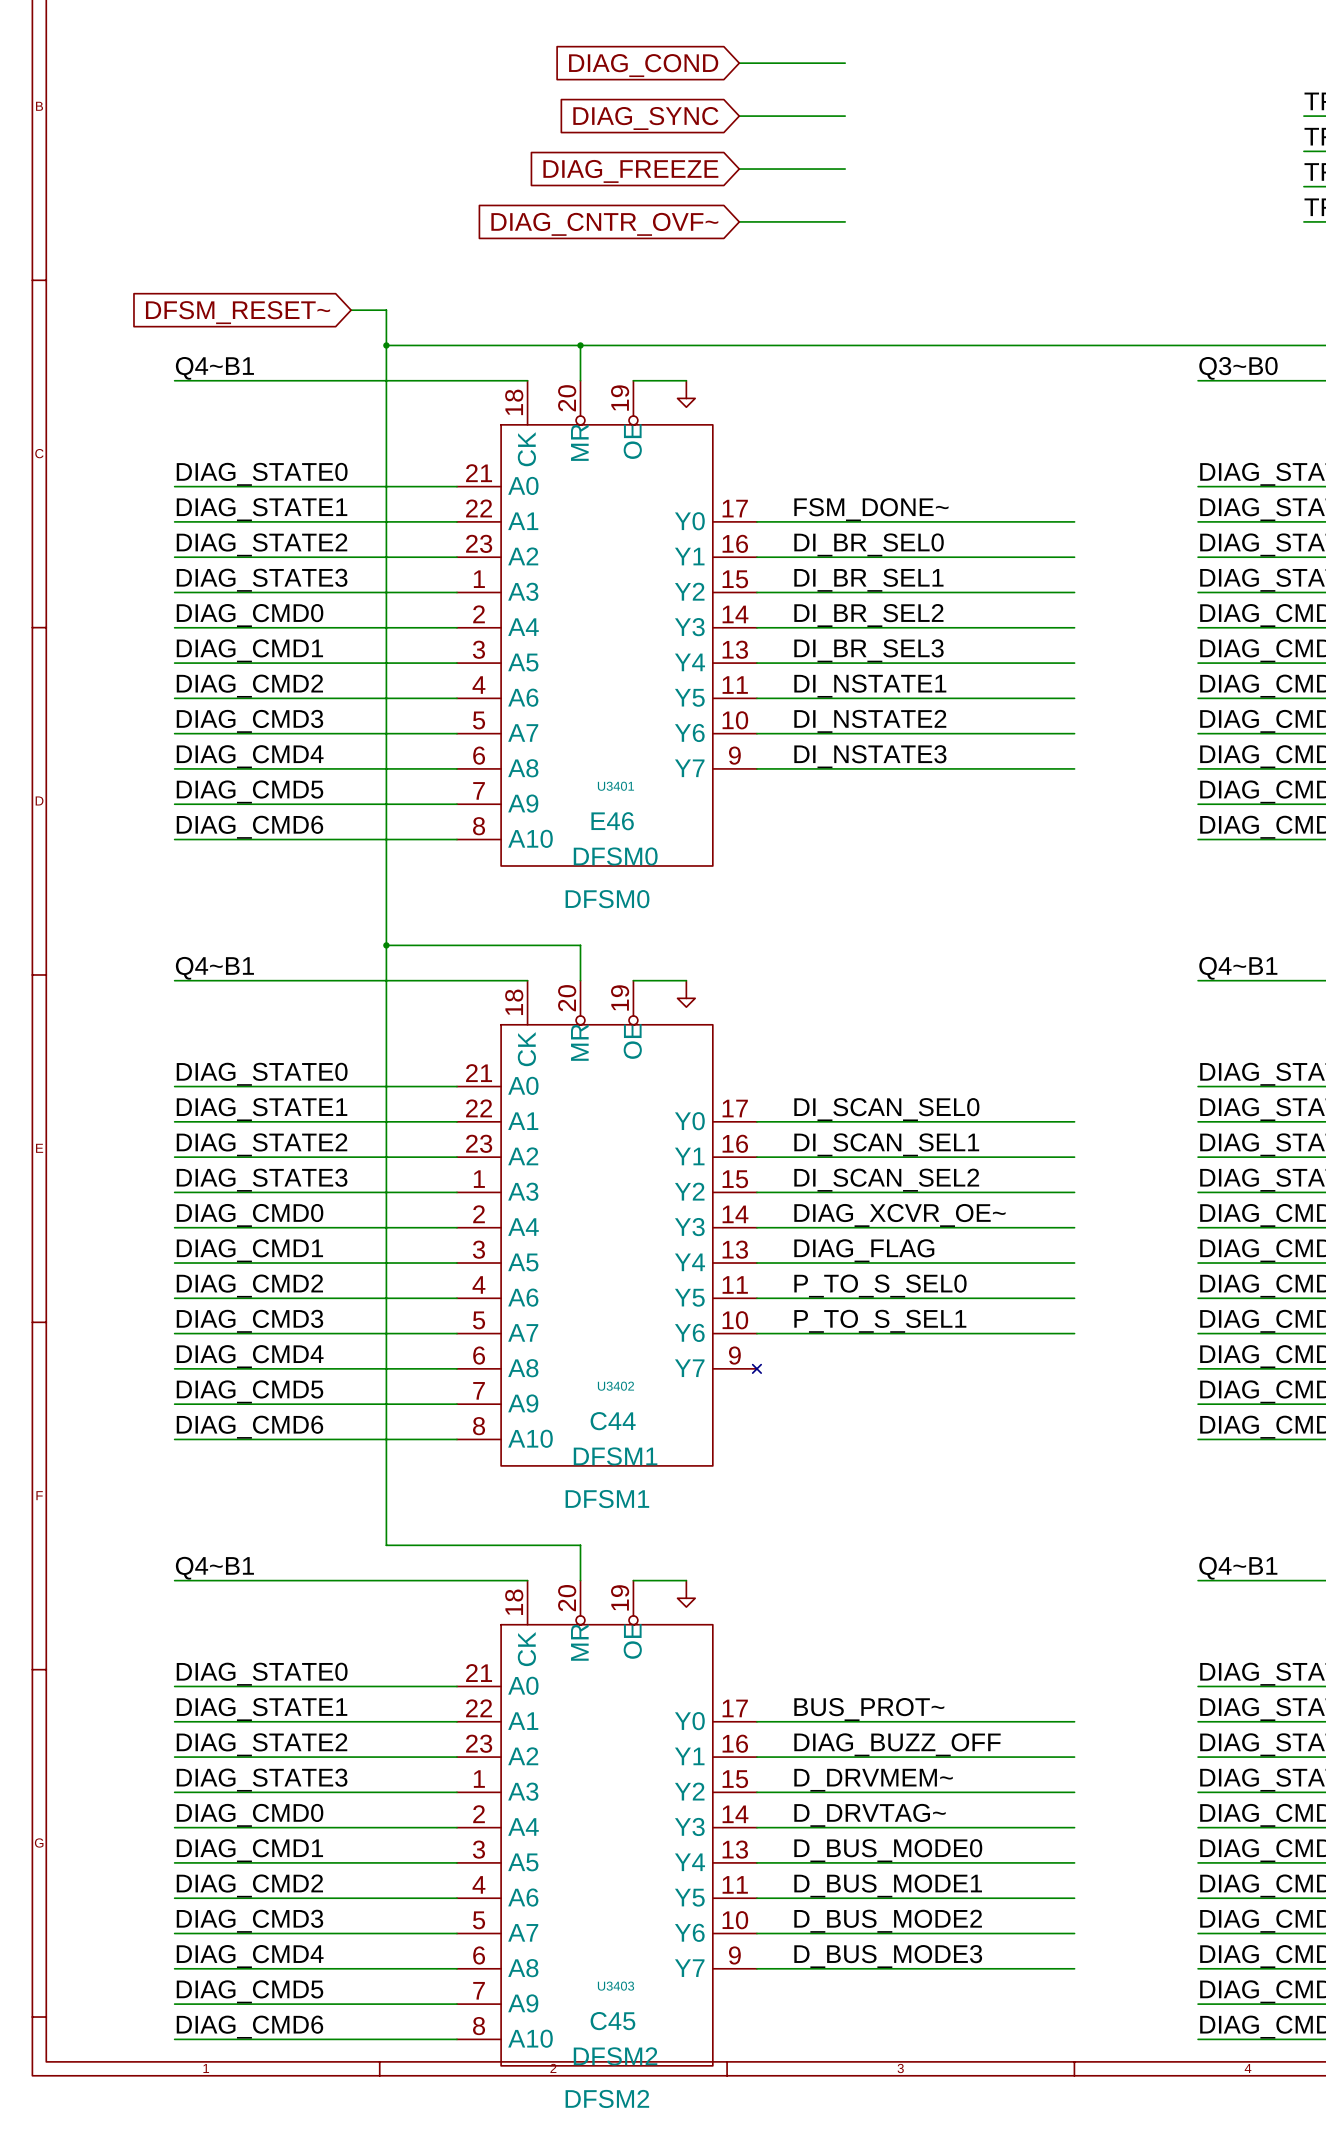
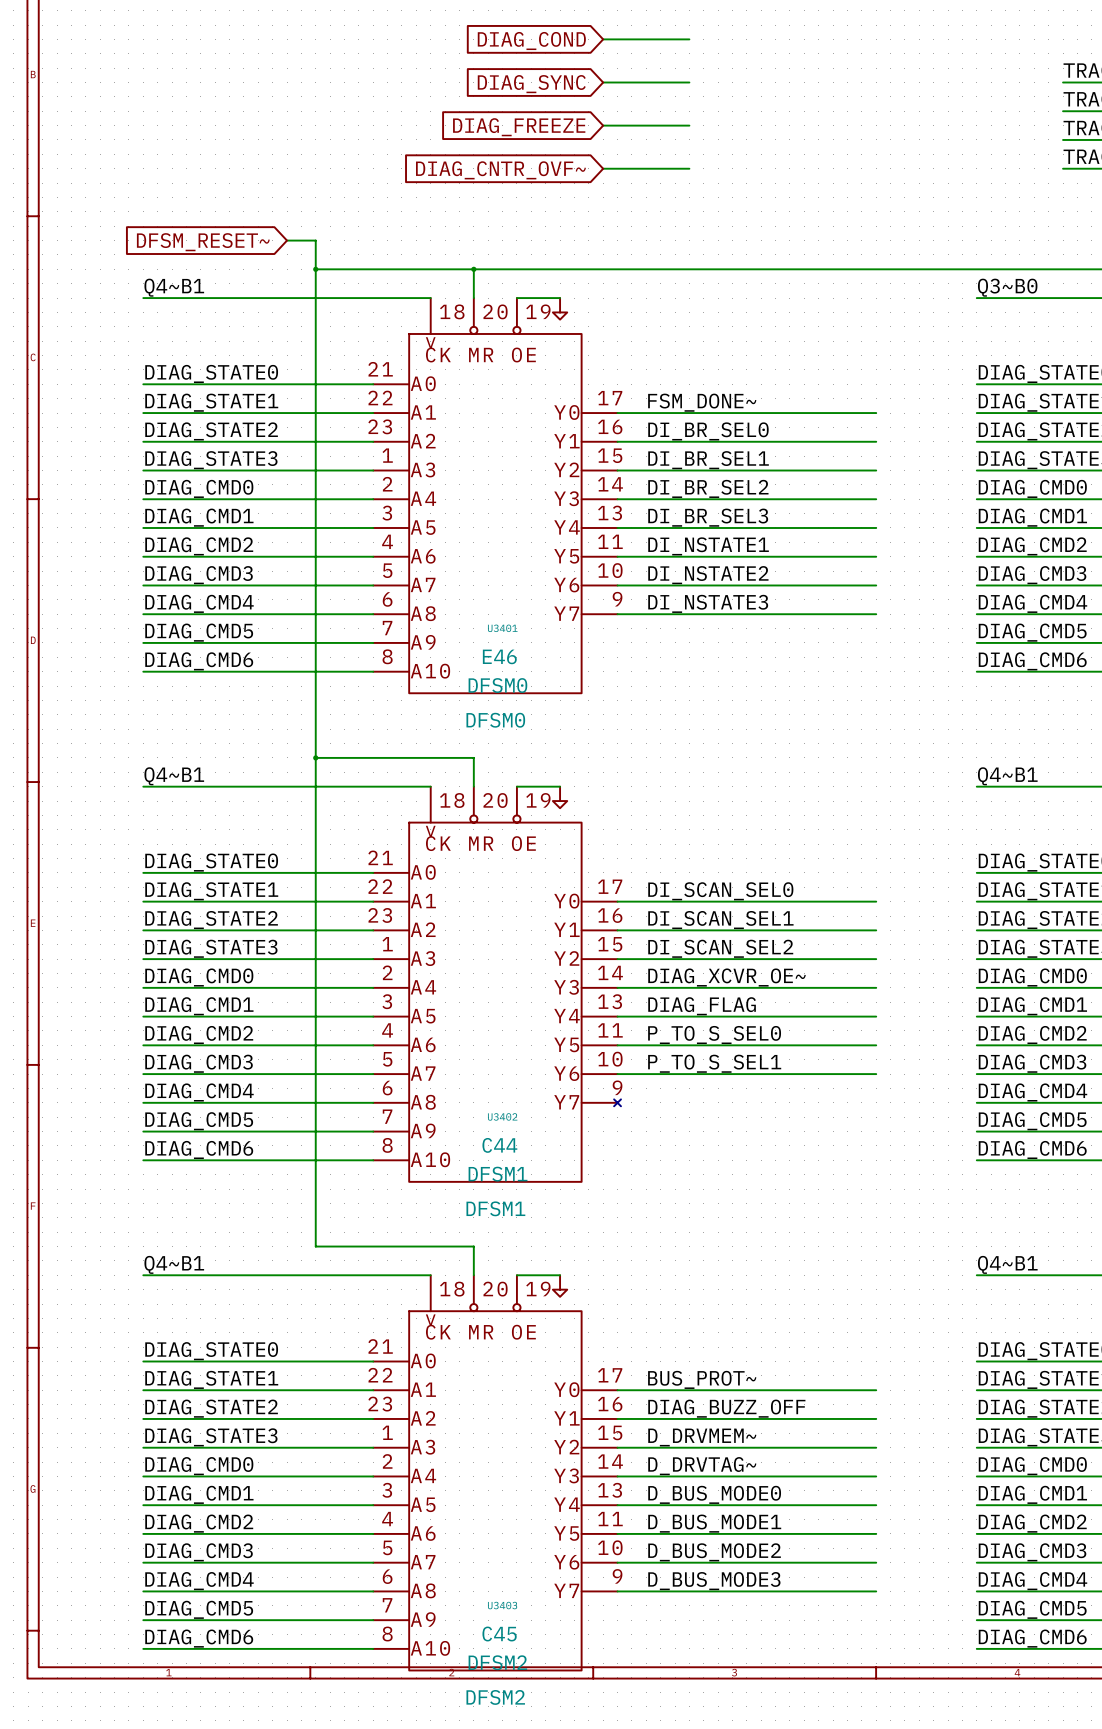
U3401 symbol: [456, 380, 757, 866] -> [373, 298, 618, 694]
U3402 symbol: [456, 980, 757, 1466] -> [373, 786, 618, 1182]
U3403 symbol: [456, 1580, 757, 2066] -> [373, 1275, 618, 1671]

